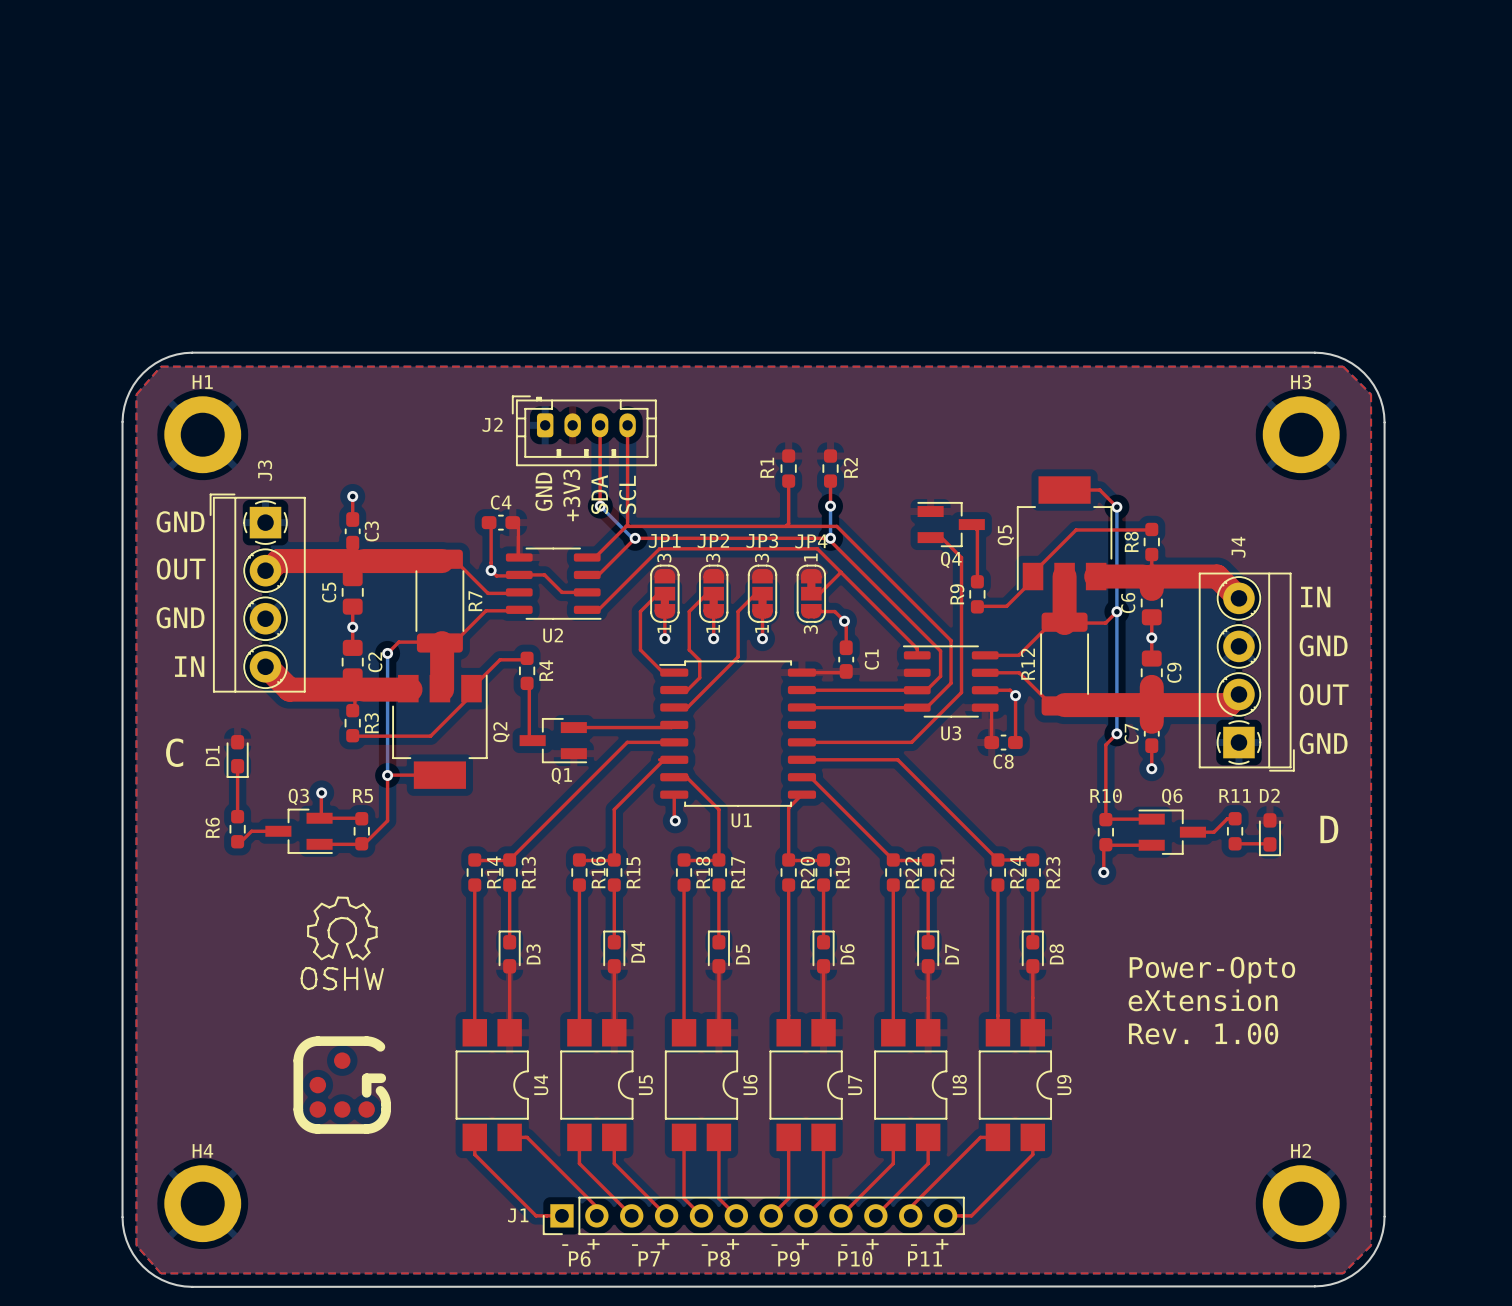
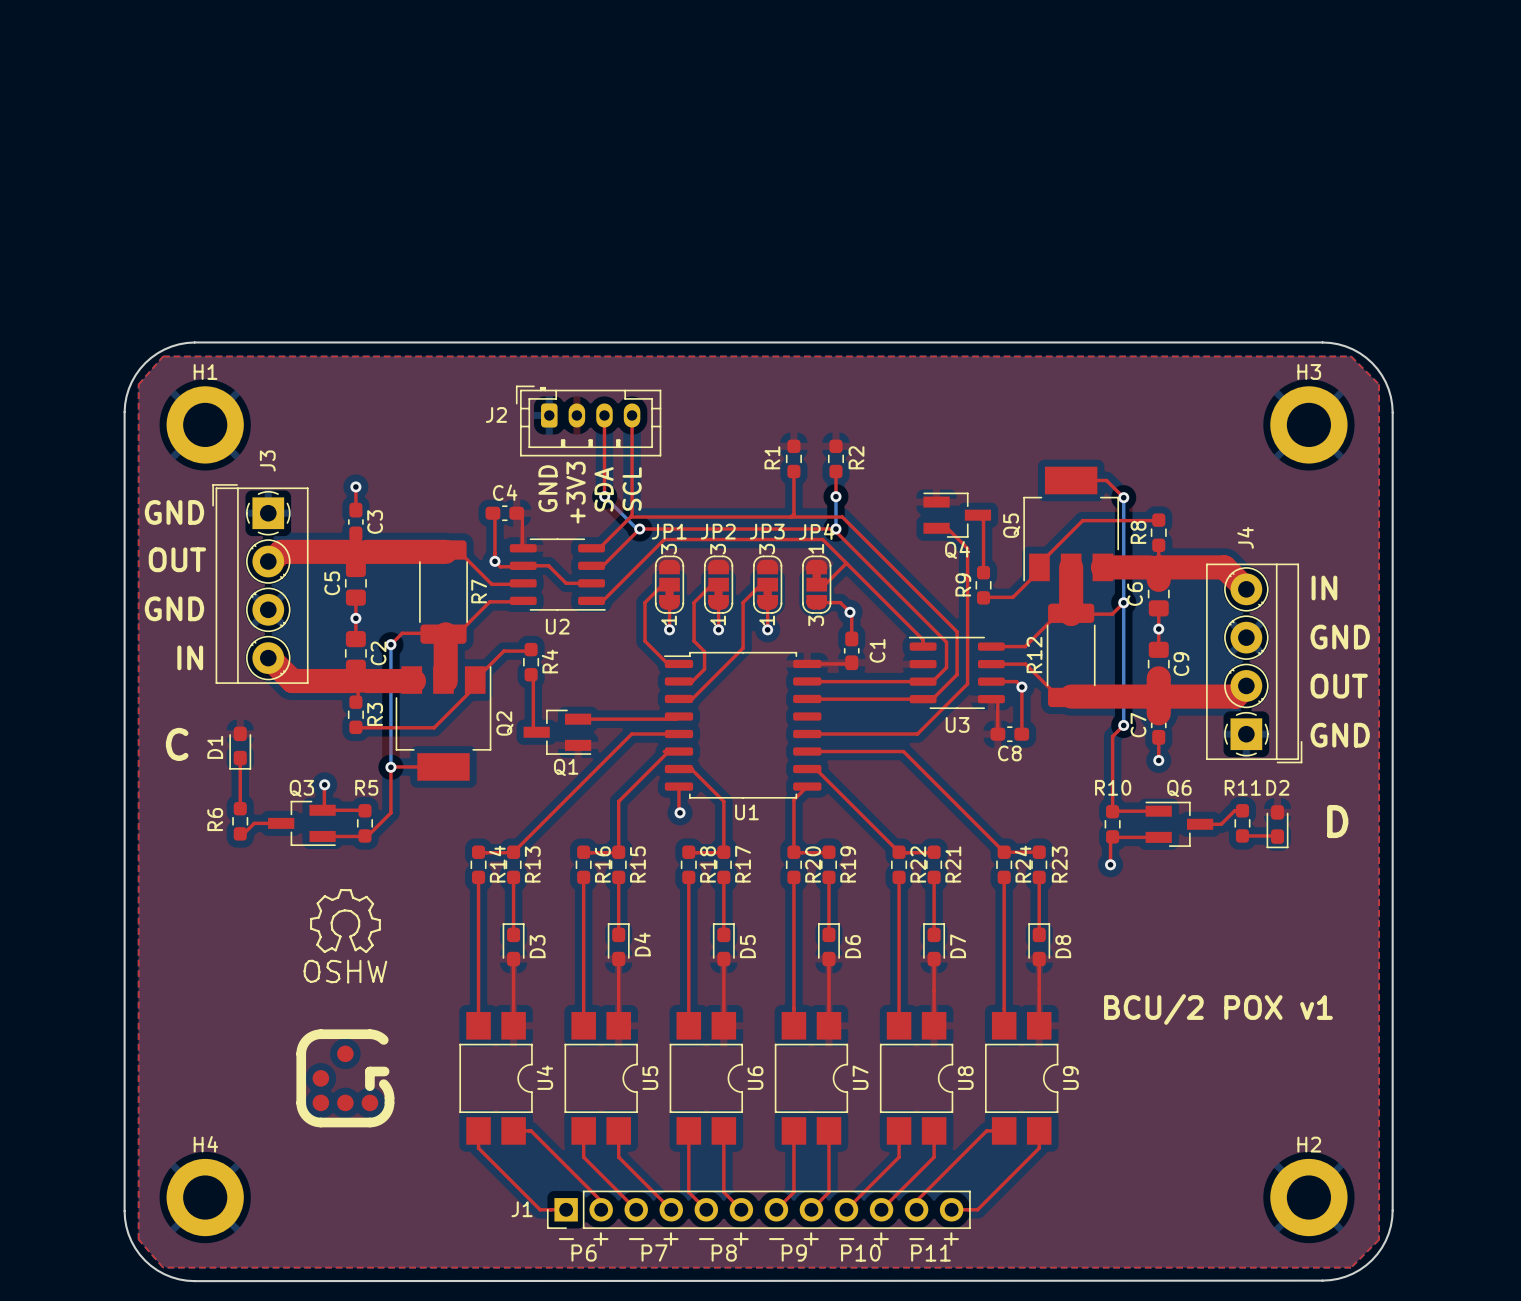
text: Power-Opto (1212, 970) -> none
text: eXtension (1203, 1000) -> none
text: none -> BCU/2 POX v1 (1218, 1009)
text: Rev. 1.00 (1203, 1033) -> none

